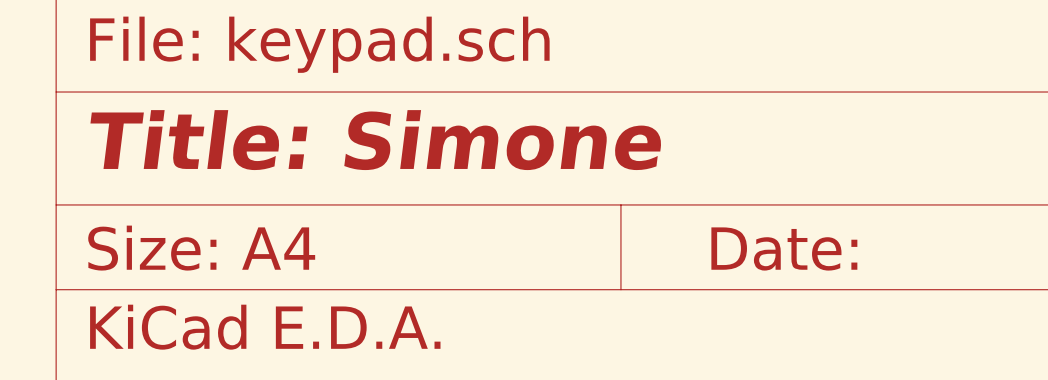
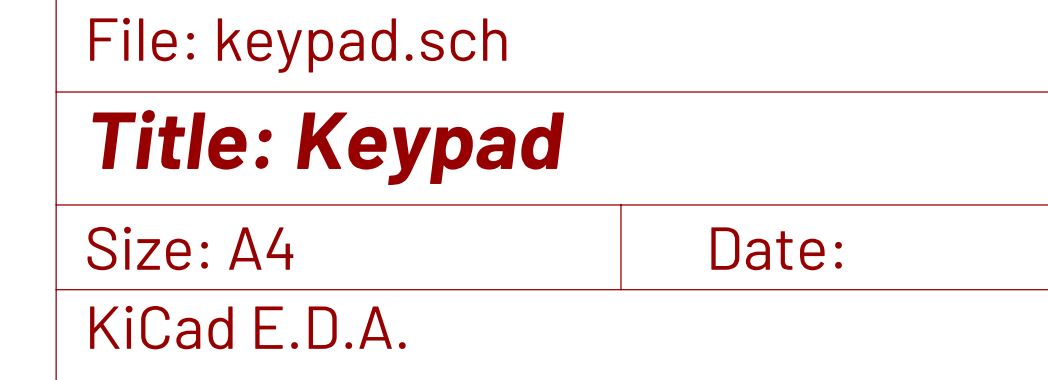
title block: Title: Simone (376, 140) -> Title: Keypad (328, 147)

